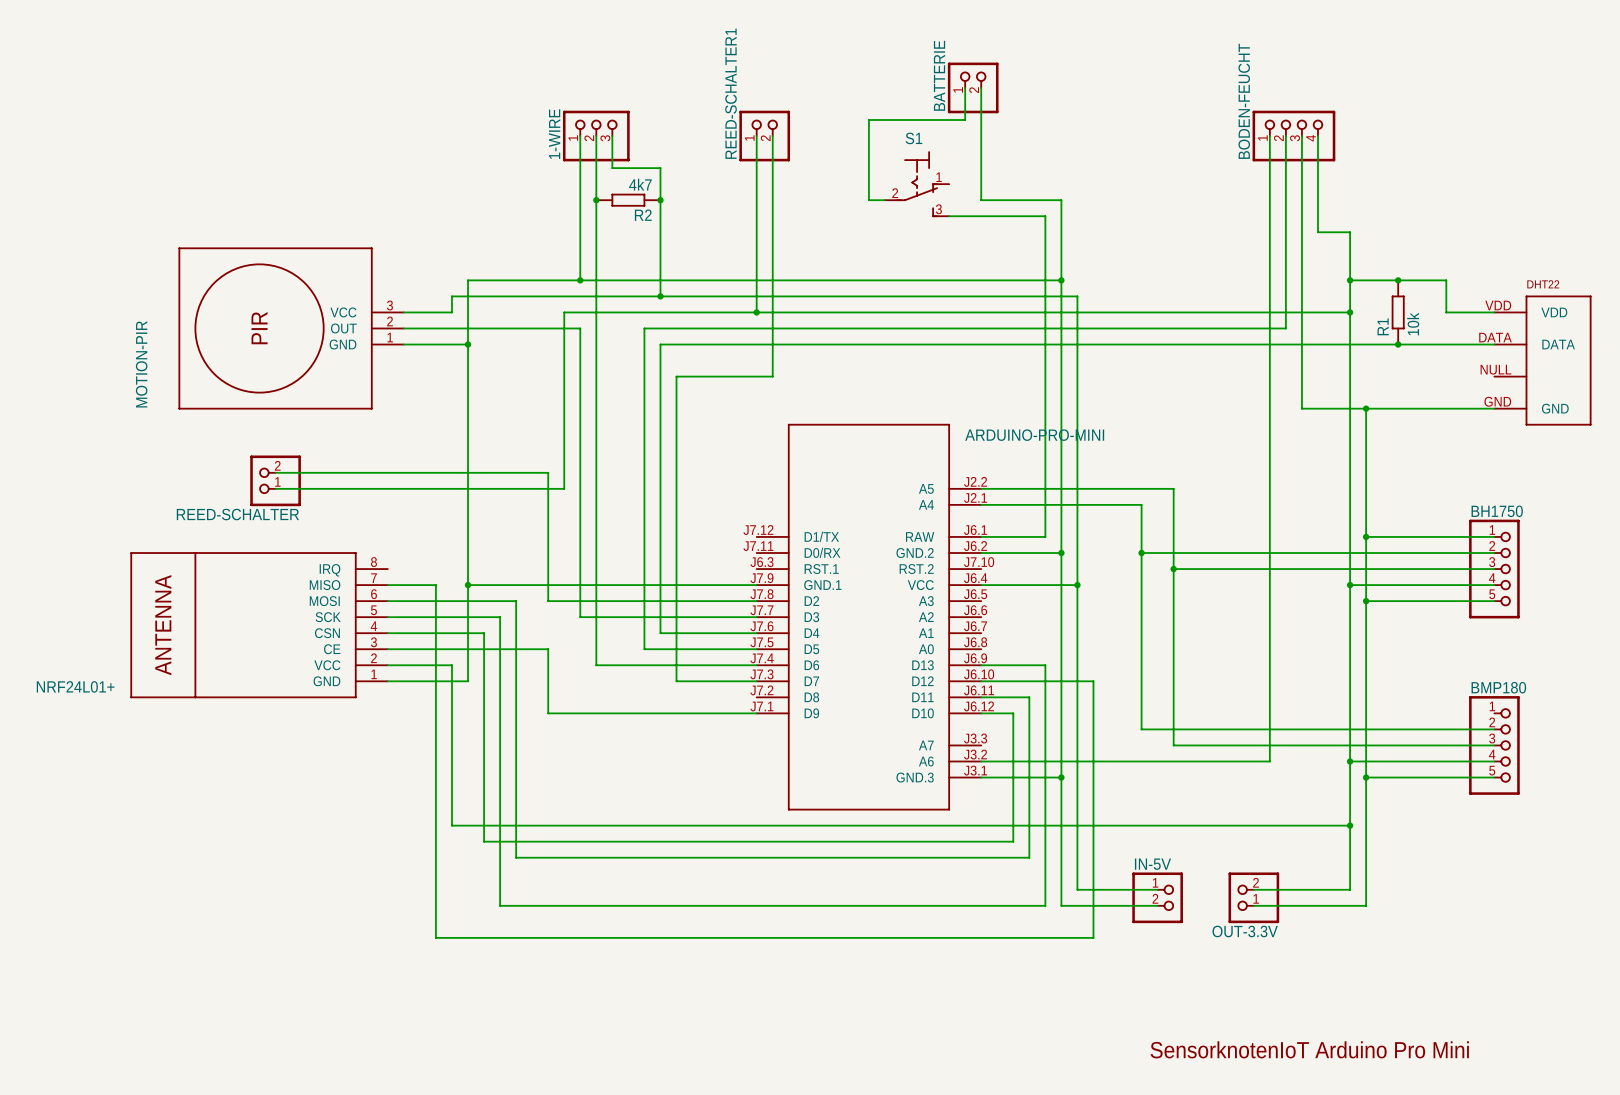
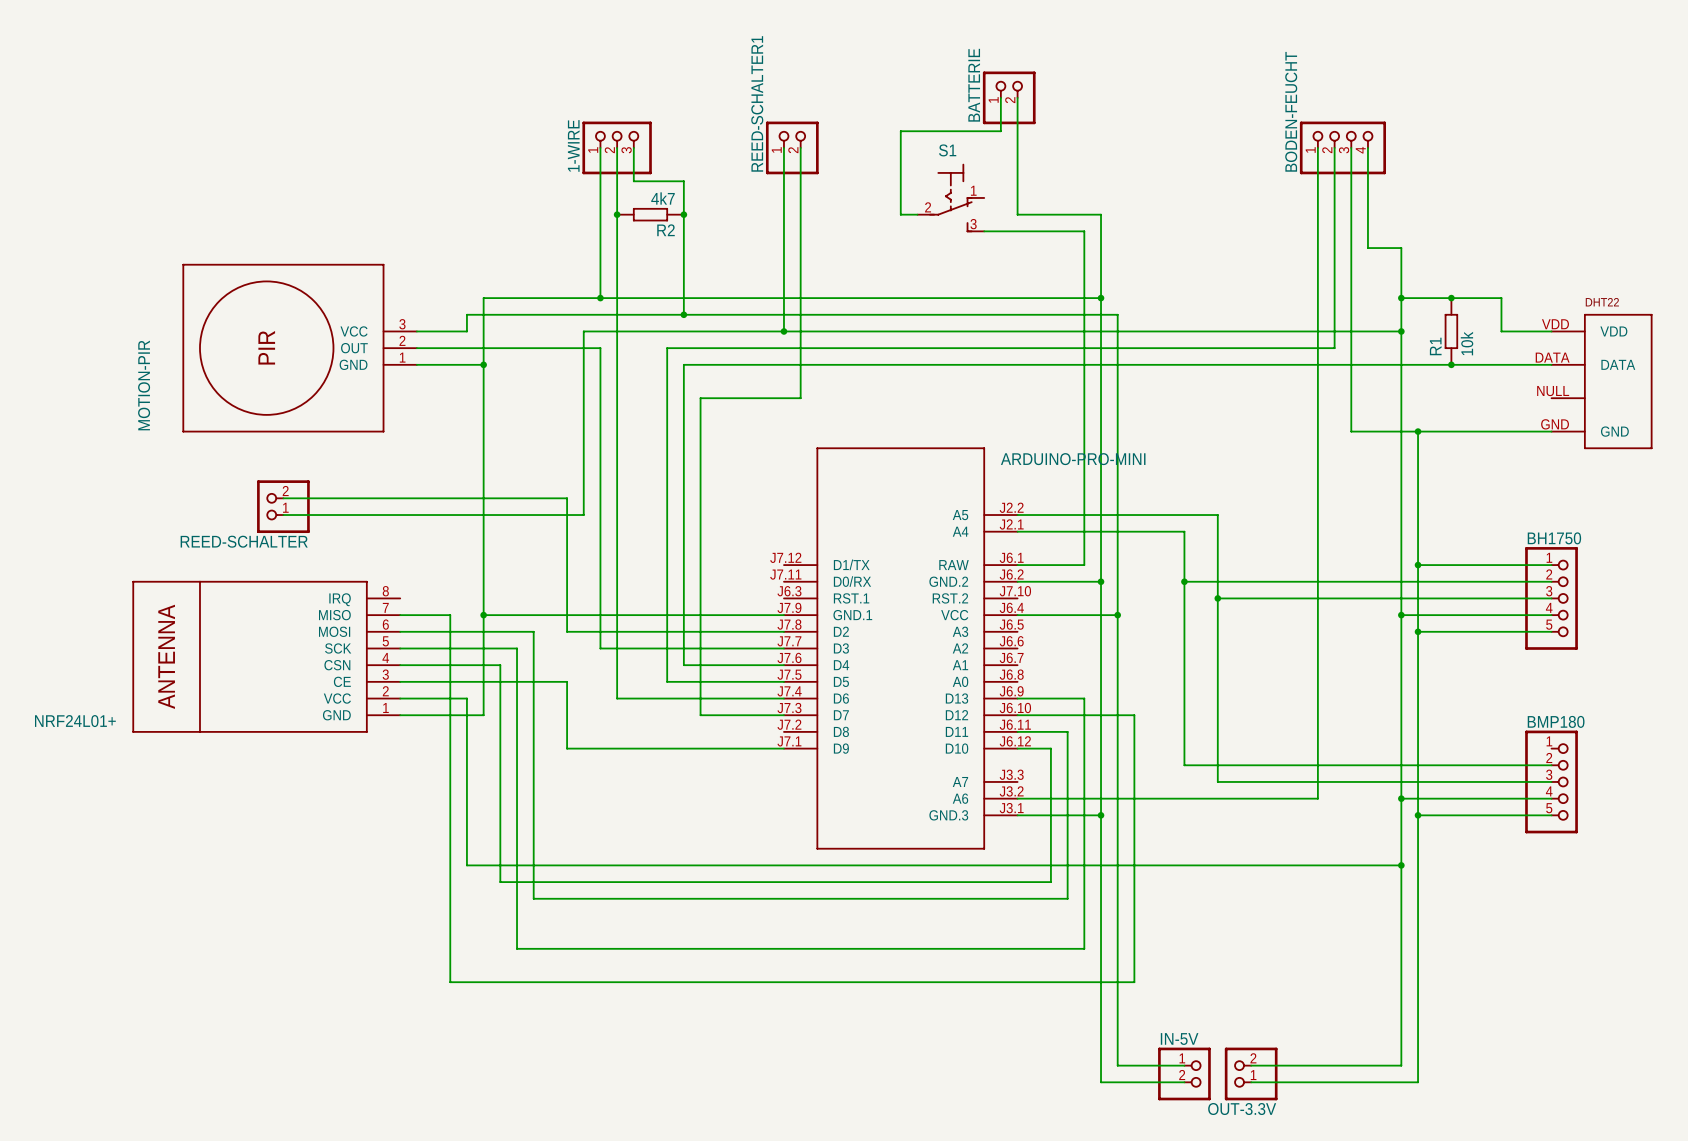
wire: (1077, 889) (1157, 889) -> (1117, 932) (1117, 1065) (1184, 1065)
wire: (1253, 889) (1350, 889) -> (1251, 1065) (1401, 1065) (1401, 932)
IN-5V position: (1157, 897) -> (1184, 1073)
OUT-3.3V position: (1253, 897) -> (1251, 1073)
wire: (1061, 905) (1157, 905) -> (1101, 948) (1101, 1082) (1184, 1082)
wire: (1253, 905) (1366, 905) -> (1251, 1082) (1418, 1082) (1418, 948)
text: SensorknotenIoT Arduino Pro Mini (1309, 1049) -> none

